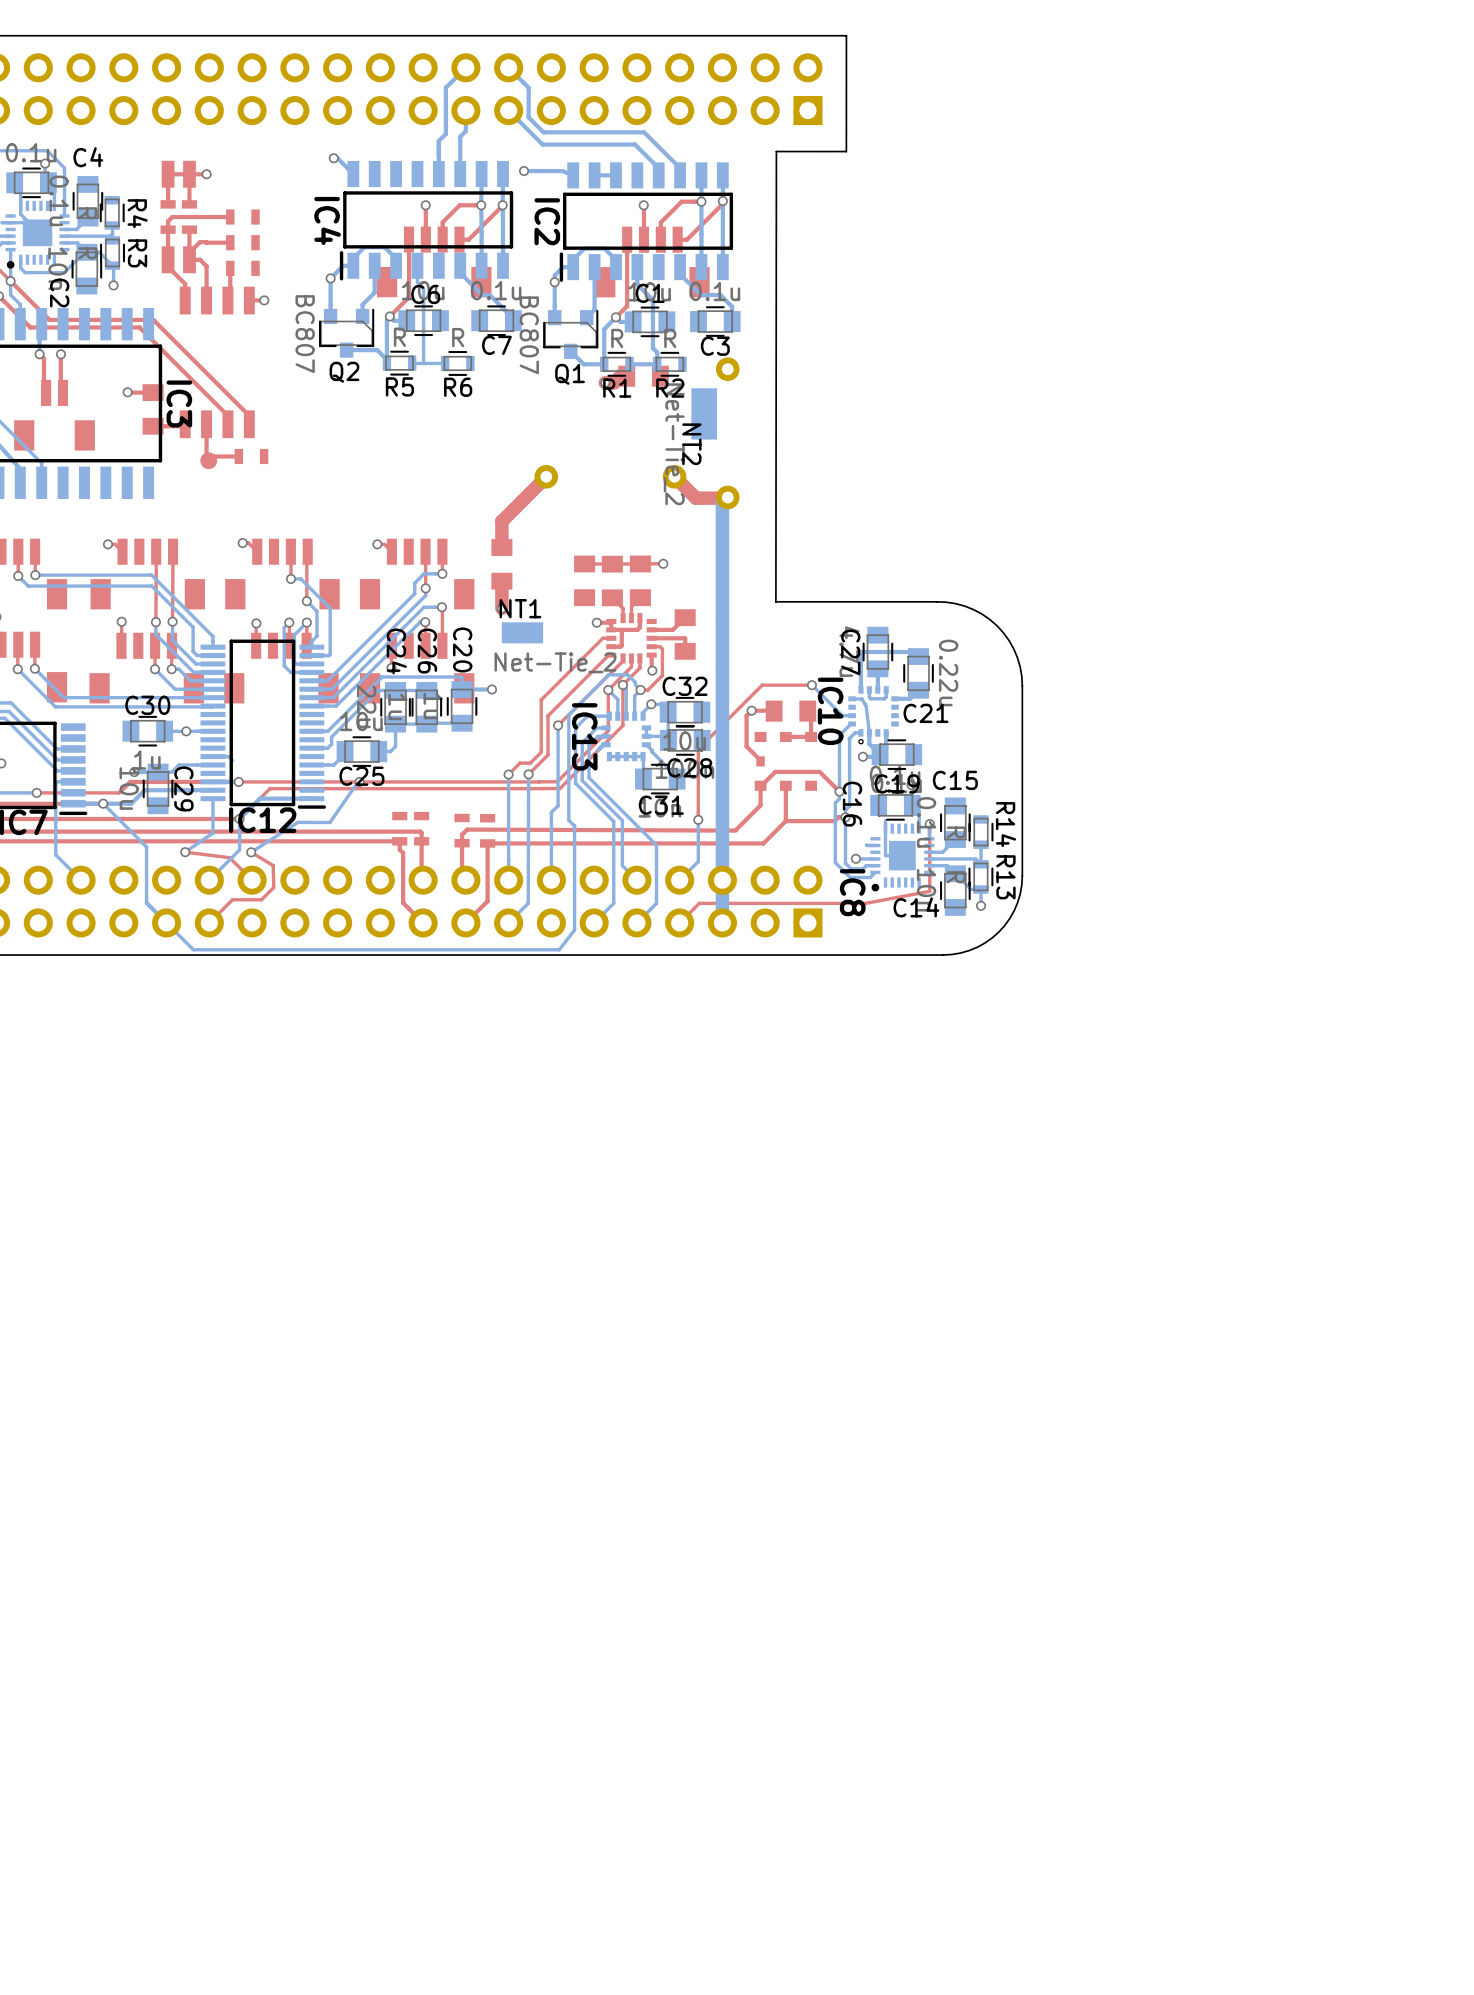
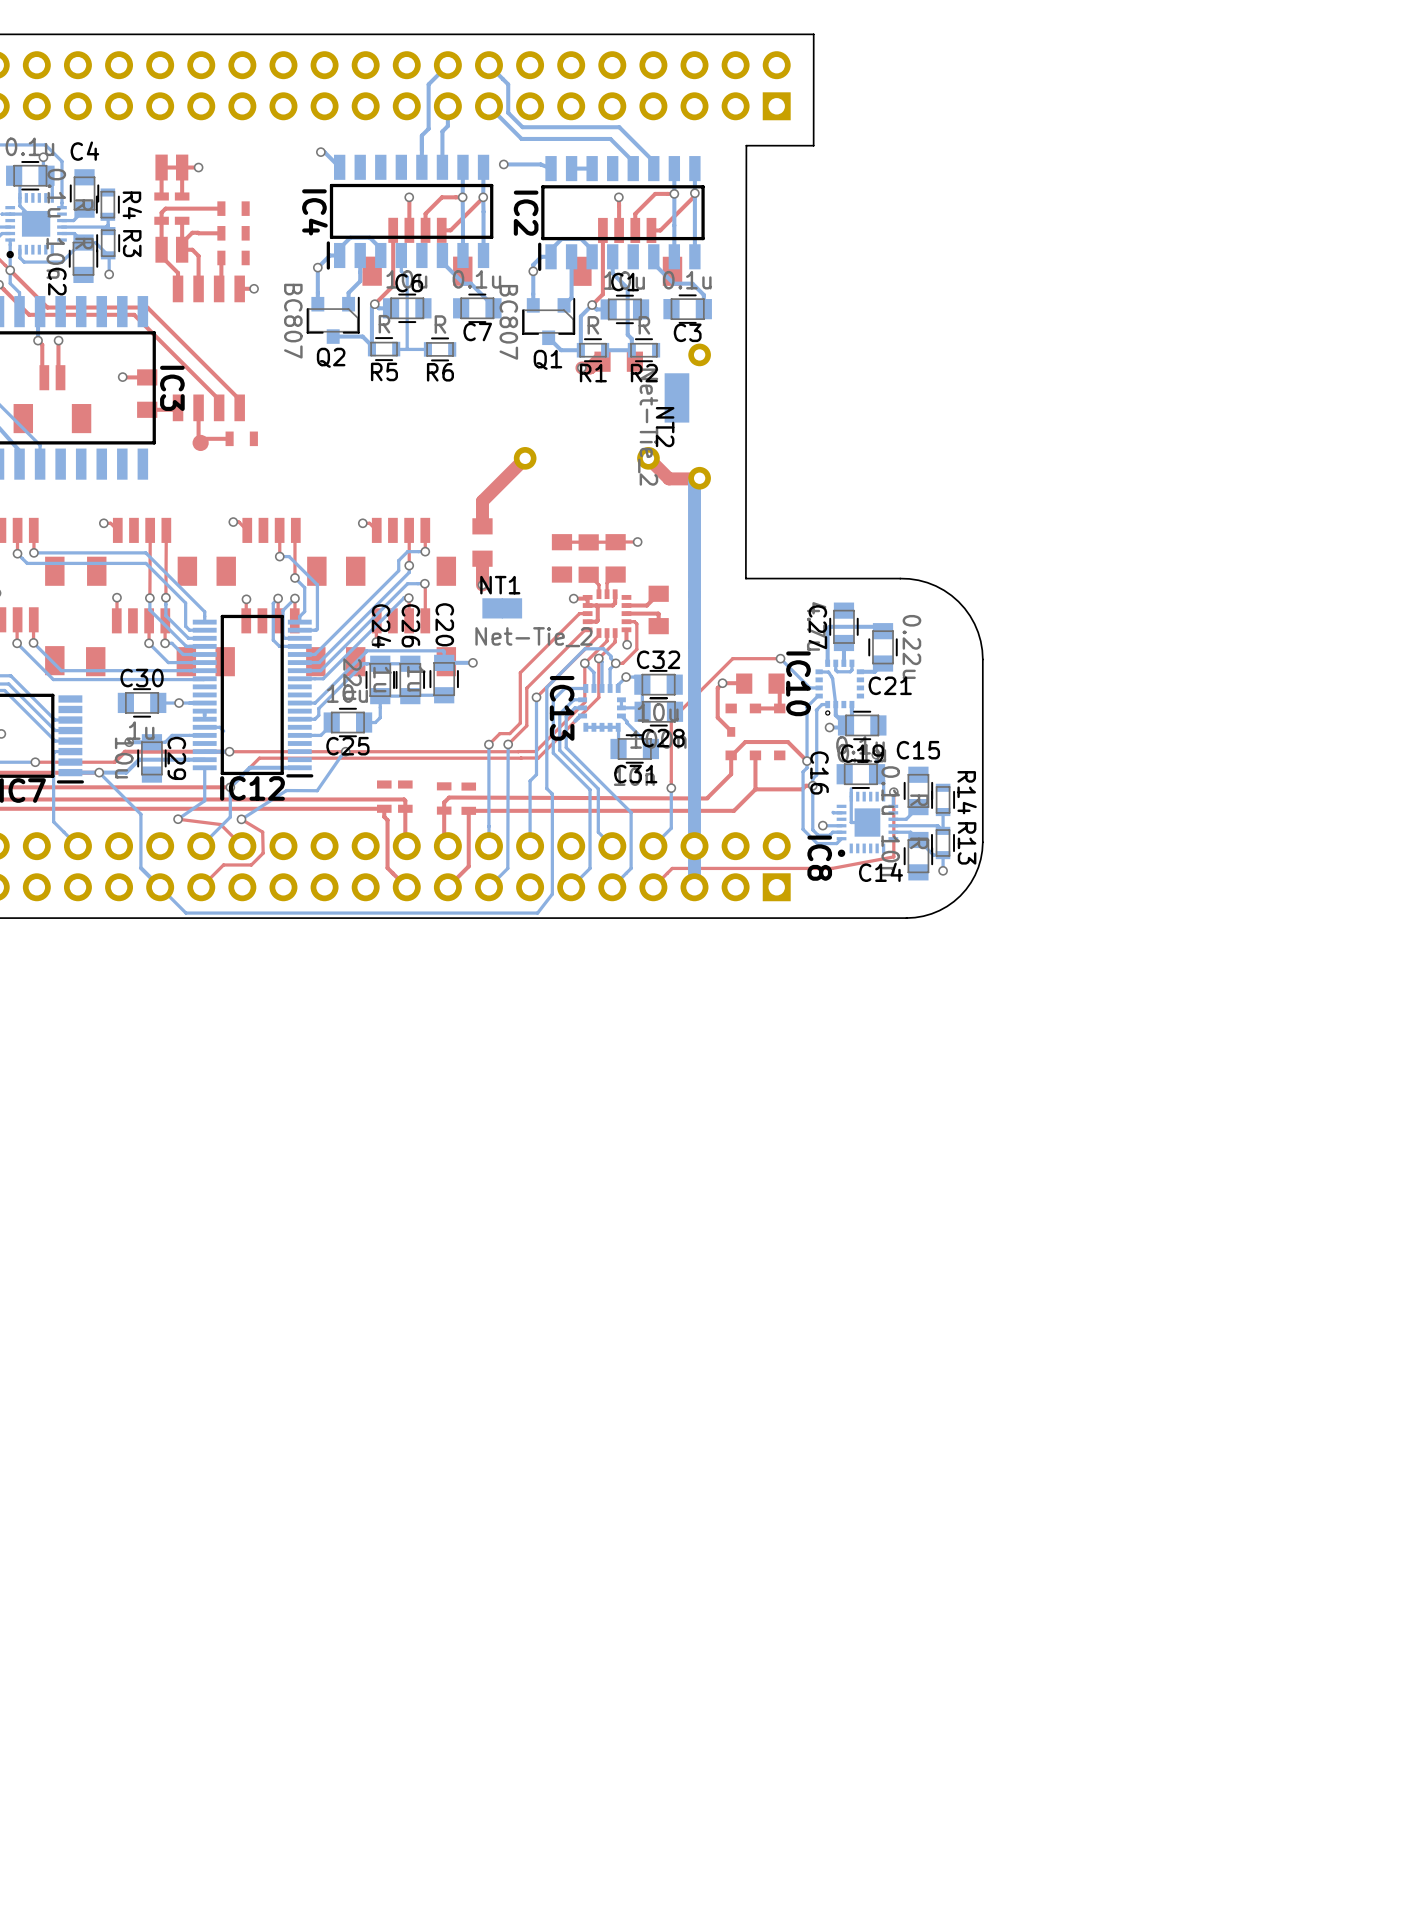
bottom track: none -> (204, 711) (204, 715)

